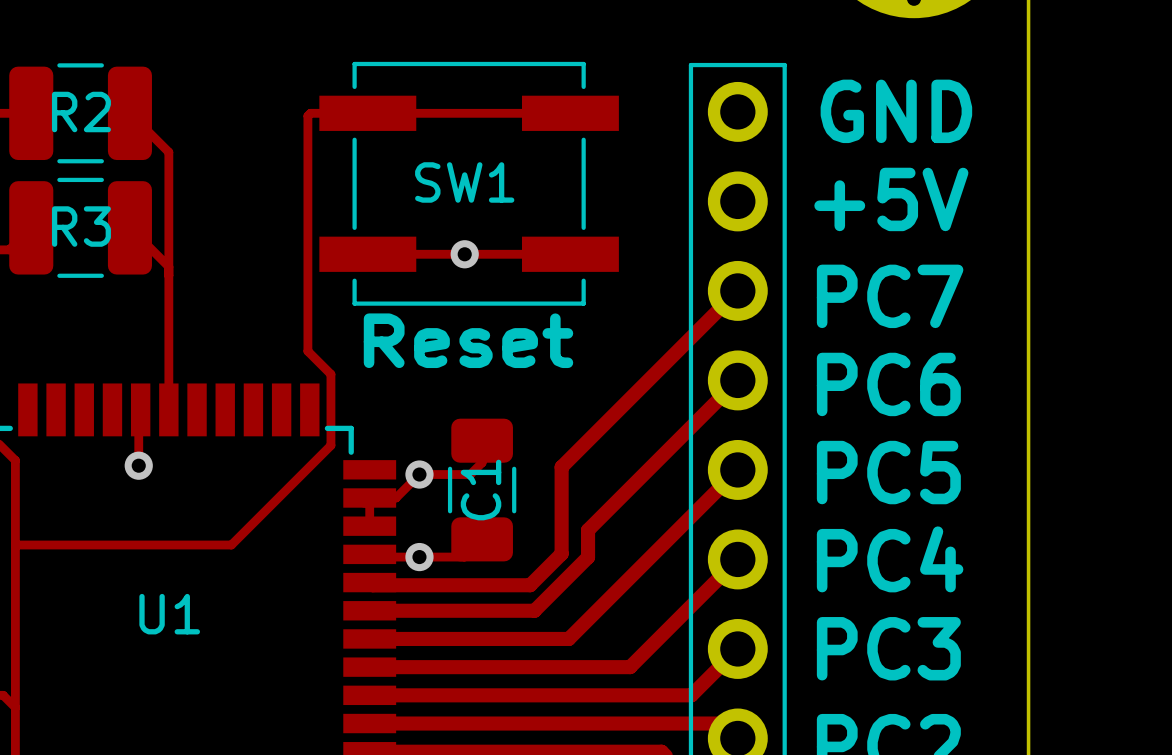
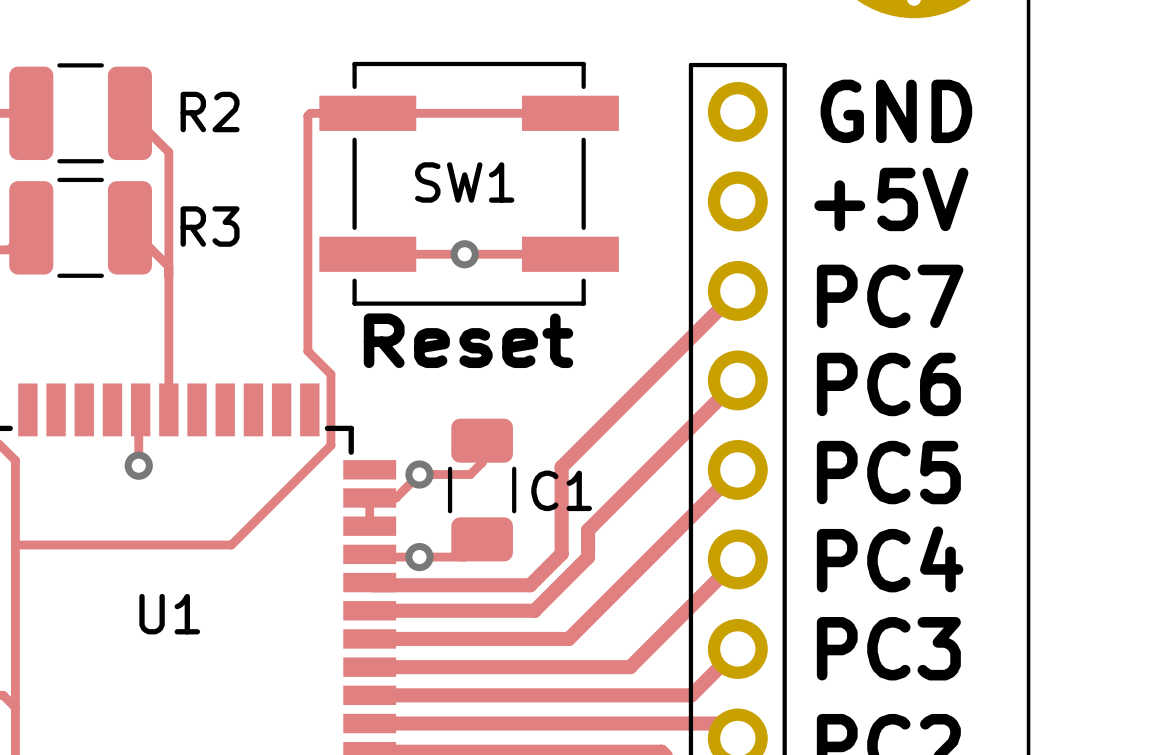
R2 name position: R2 (81, 112) -> R2 (210, 112)
R3 name position: R3 (81, 226) -> R3 (210, 226)
C1 name rotation: 0° (481, 490) -> 90° clockwise (561, 490)

